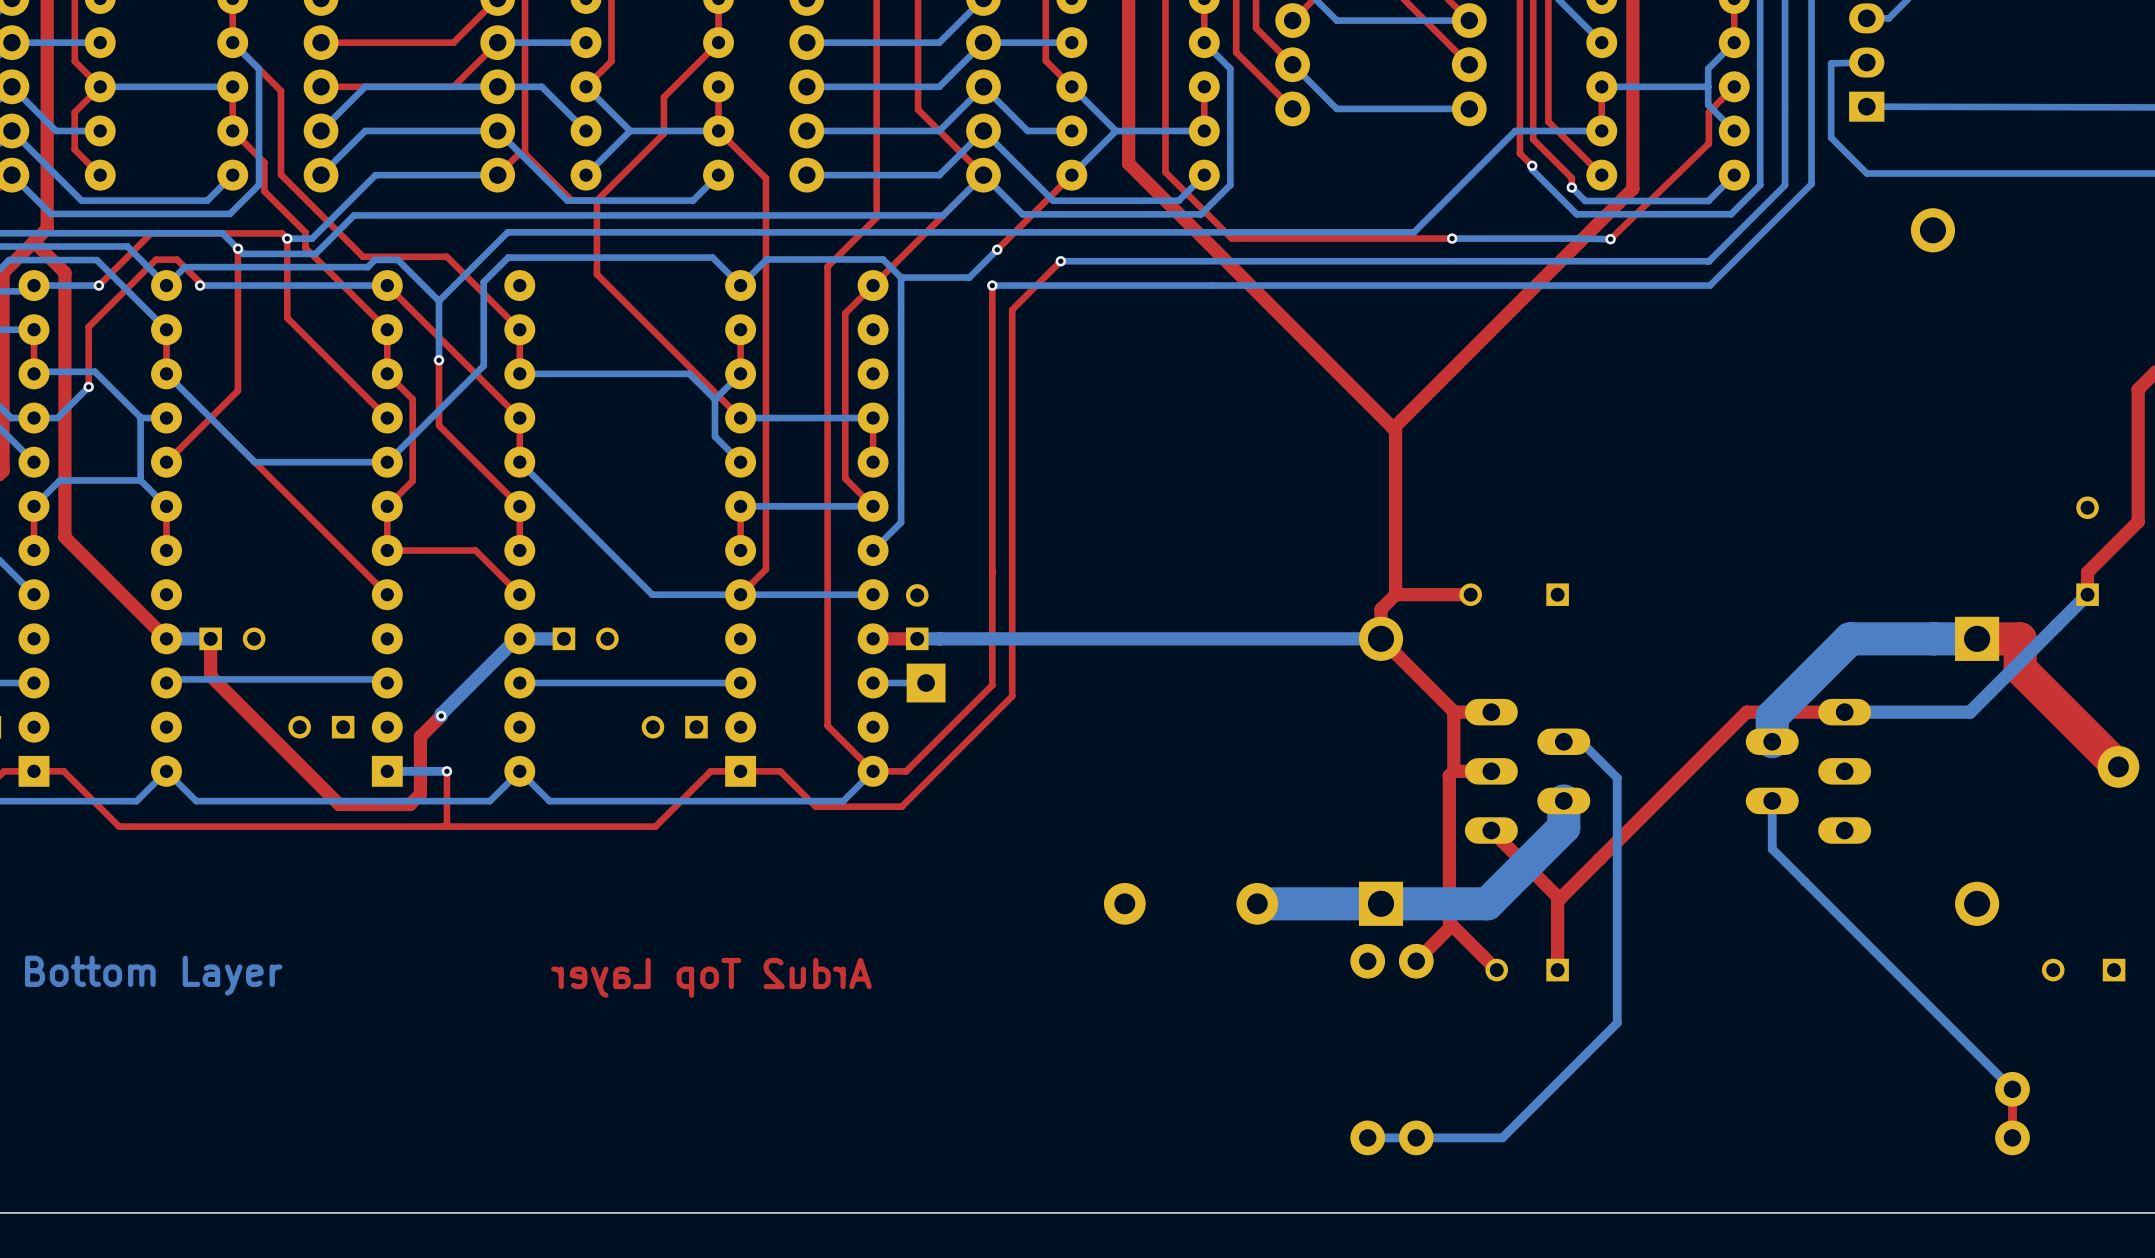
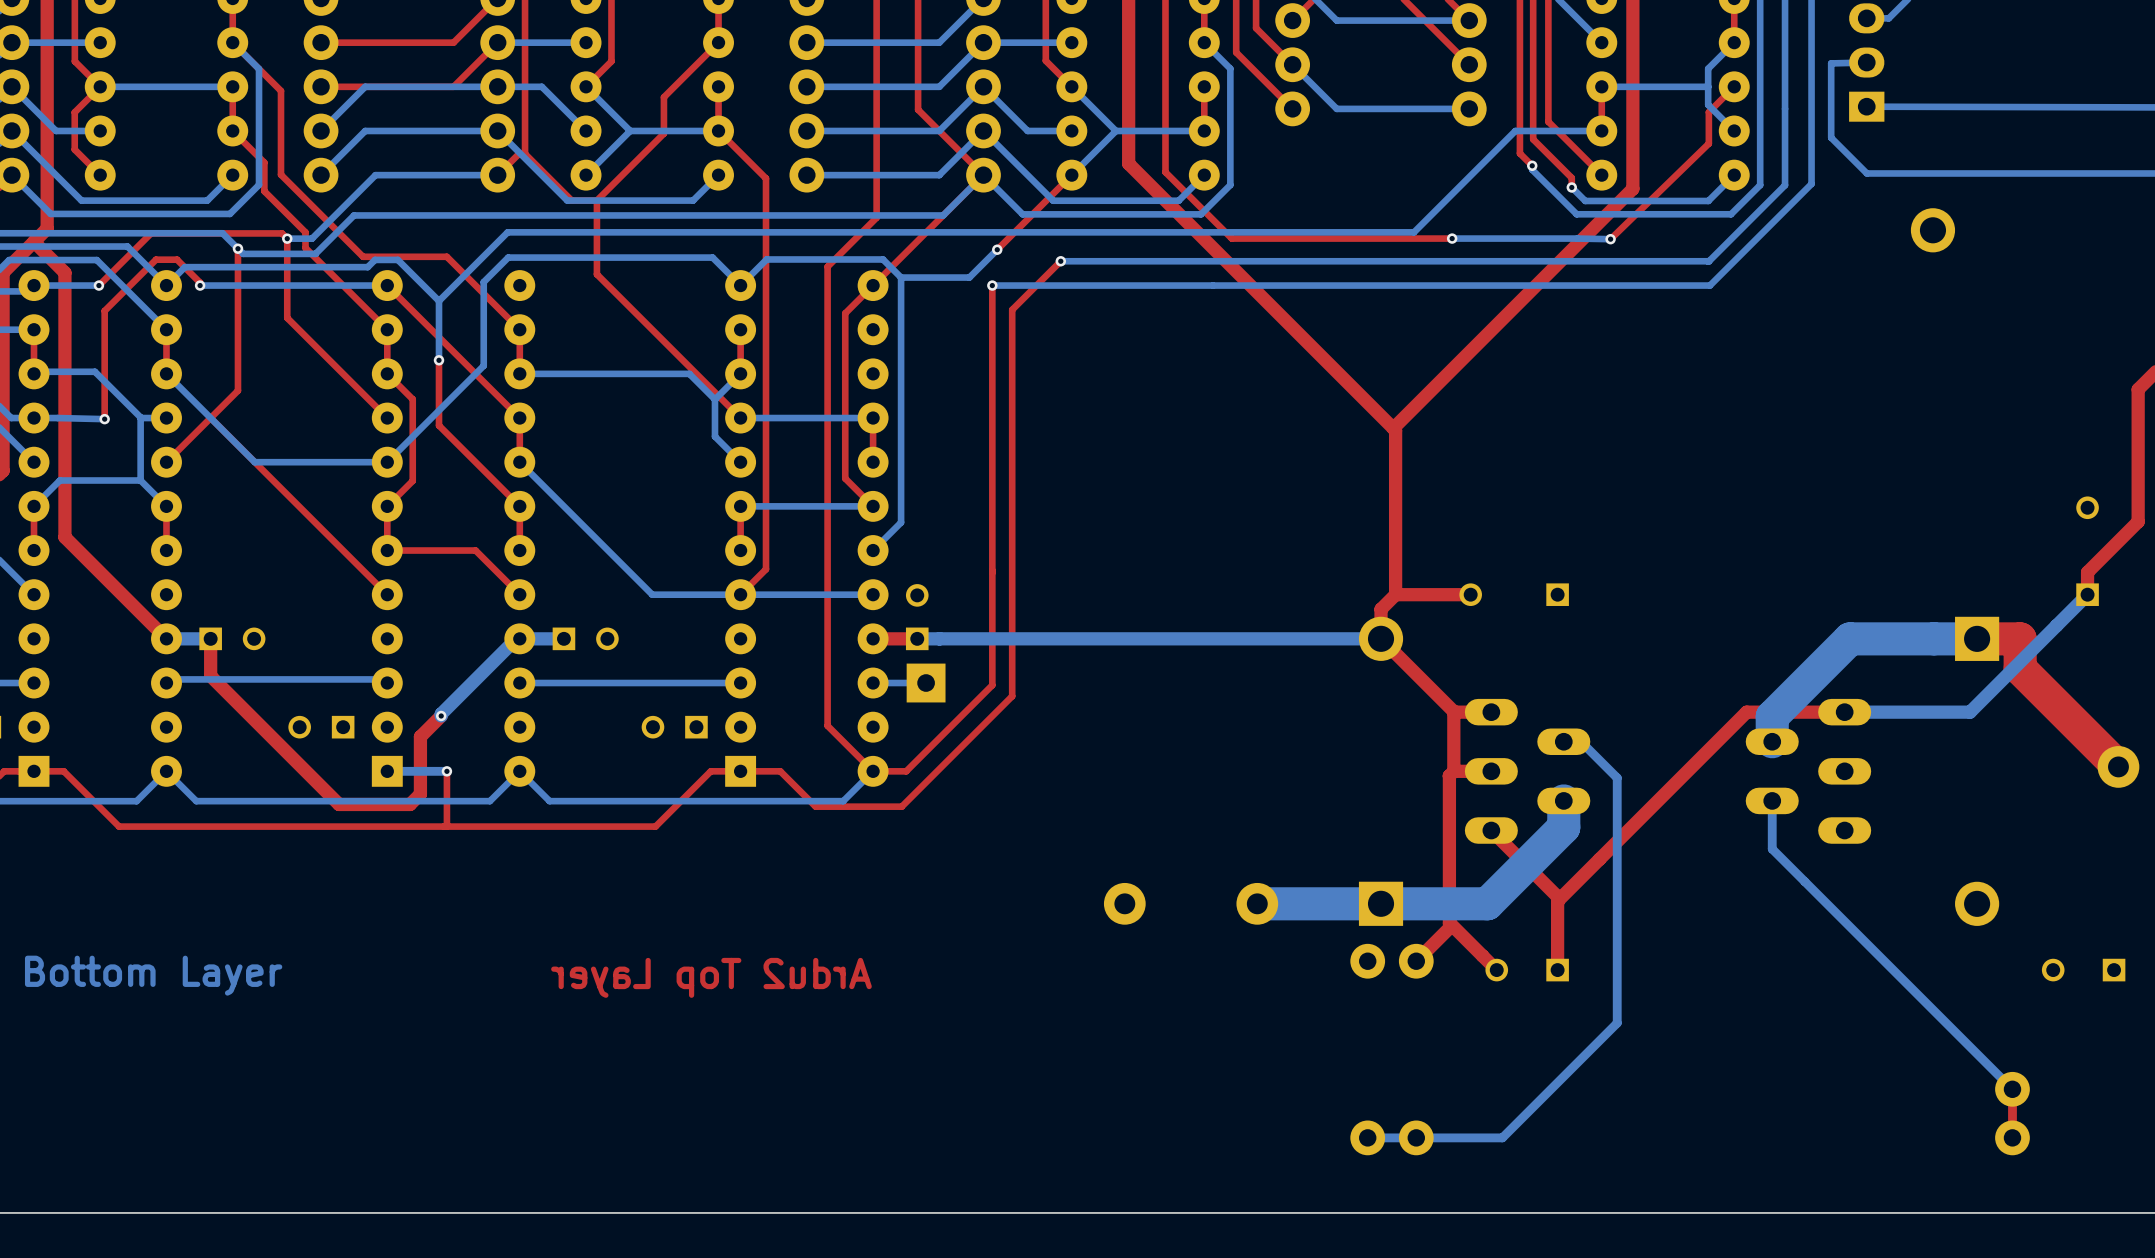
top track: (155, 259) (88, 326) (88, 386) -> (155, 259) (104, 310) (104, 419)
bottom track: (88, 386) (57, 418) -> (104, 419) (57, 418)
via position: (88, 386) -> (104, 419)

